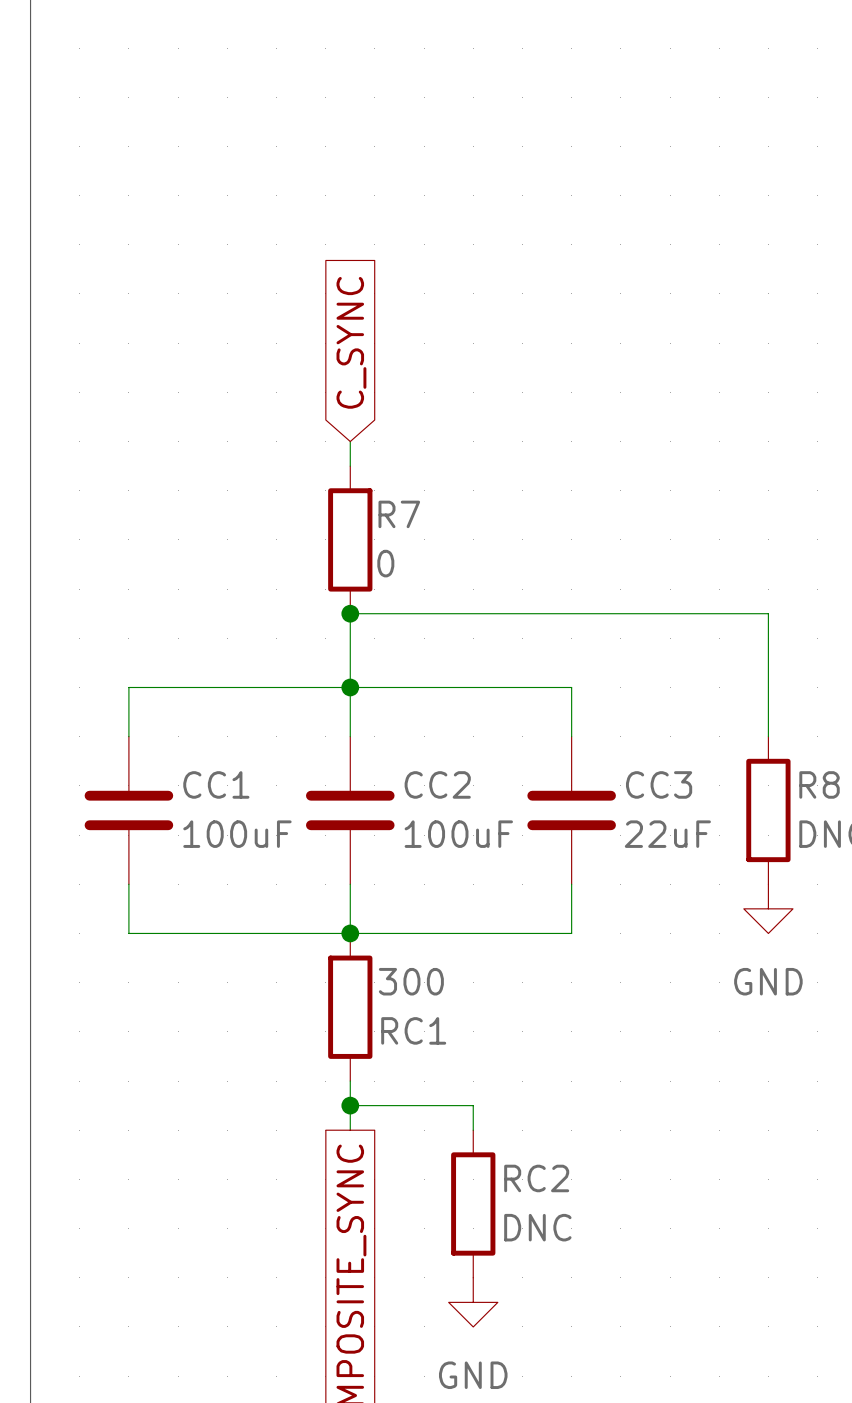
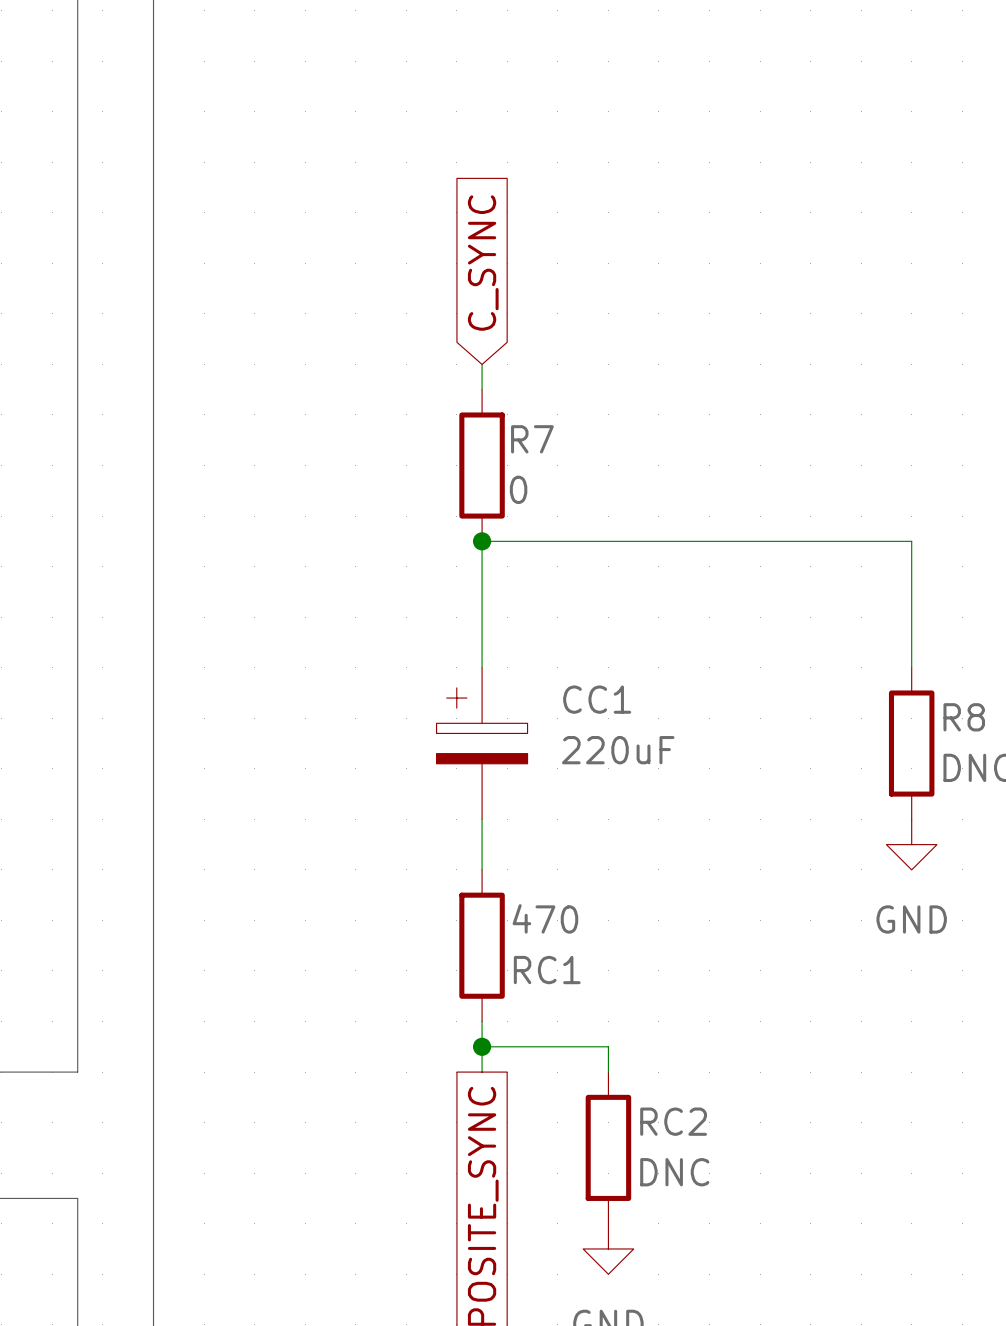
junction: (350, 687) -> none
CC1 symbol: [84, 736, 174, 885] -> [436, 667, 528, 820]
wire: (128, 736) (128, 687) (571, 687) (571, 736) -> none
CC2: 100uF (350, 810) -> none
CC3: 22uF (571, 810) -> none
CC1 value: 100uF (237, 834) -> 220uF (618, 750)
wire: (128, 884) (128, 933) (571, 933) (571, 884) -> none
junction: (350, 933) -> none
RC1 value: 300 (411, 981) -> 470 (545, 918)

